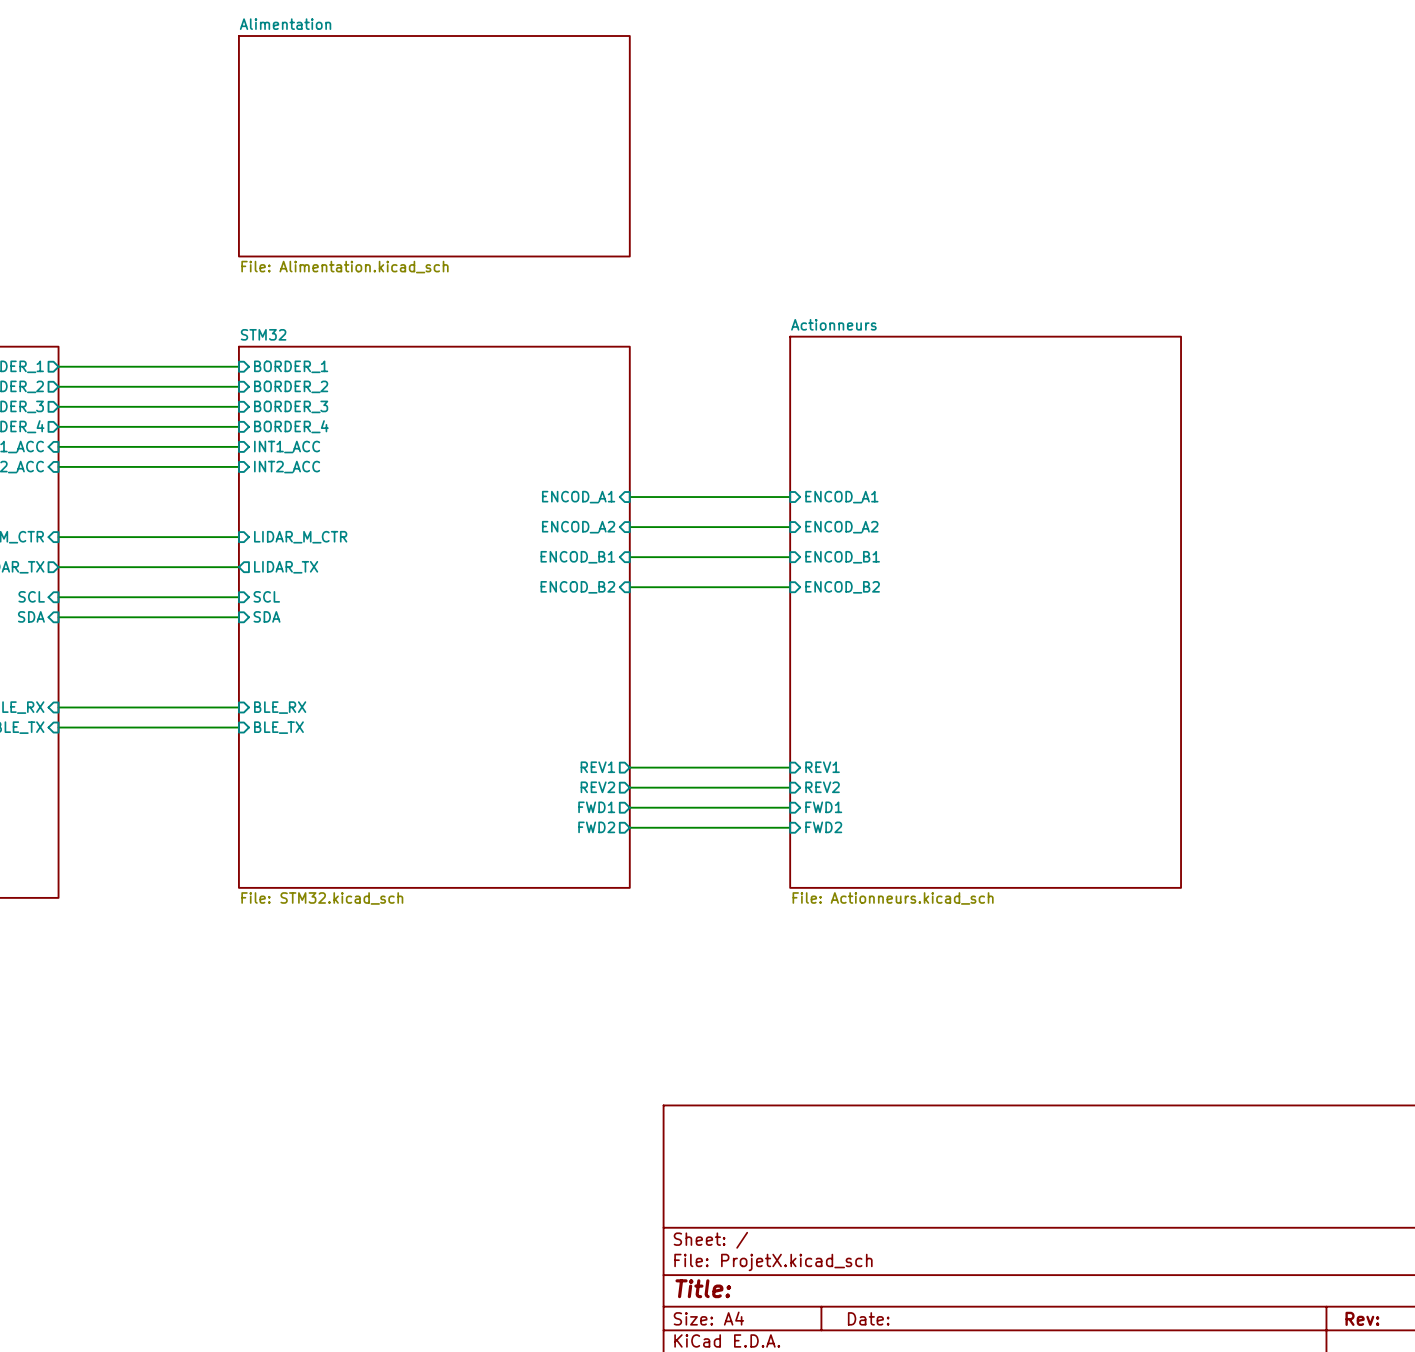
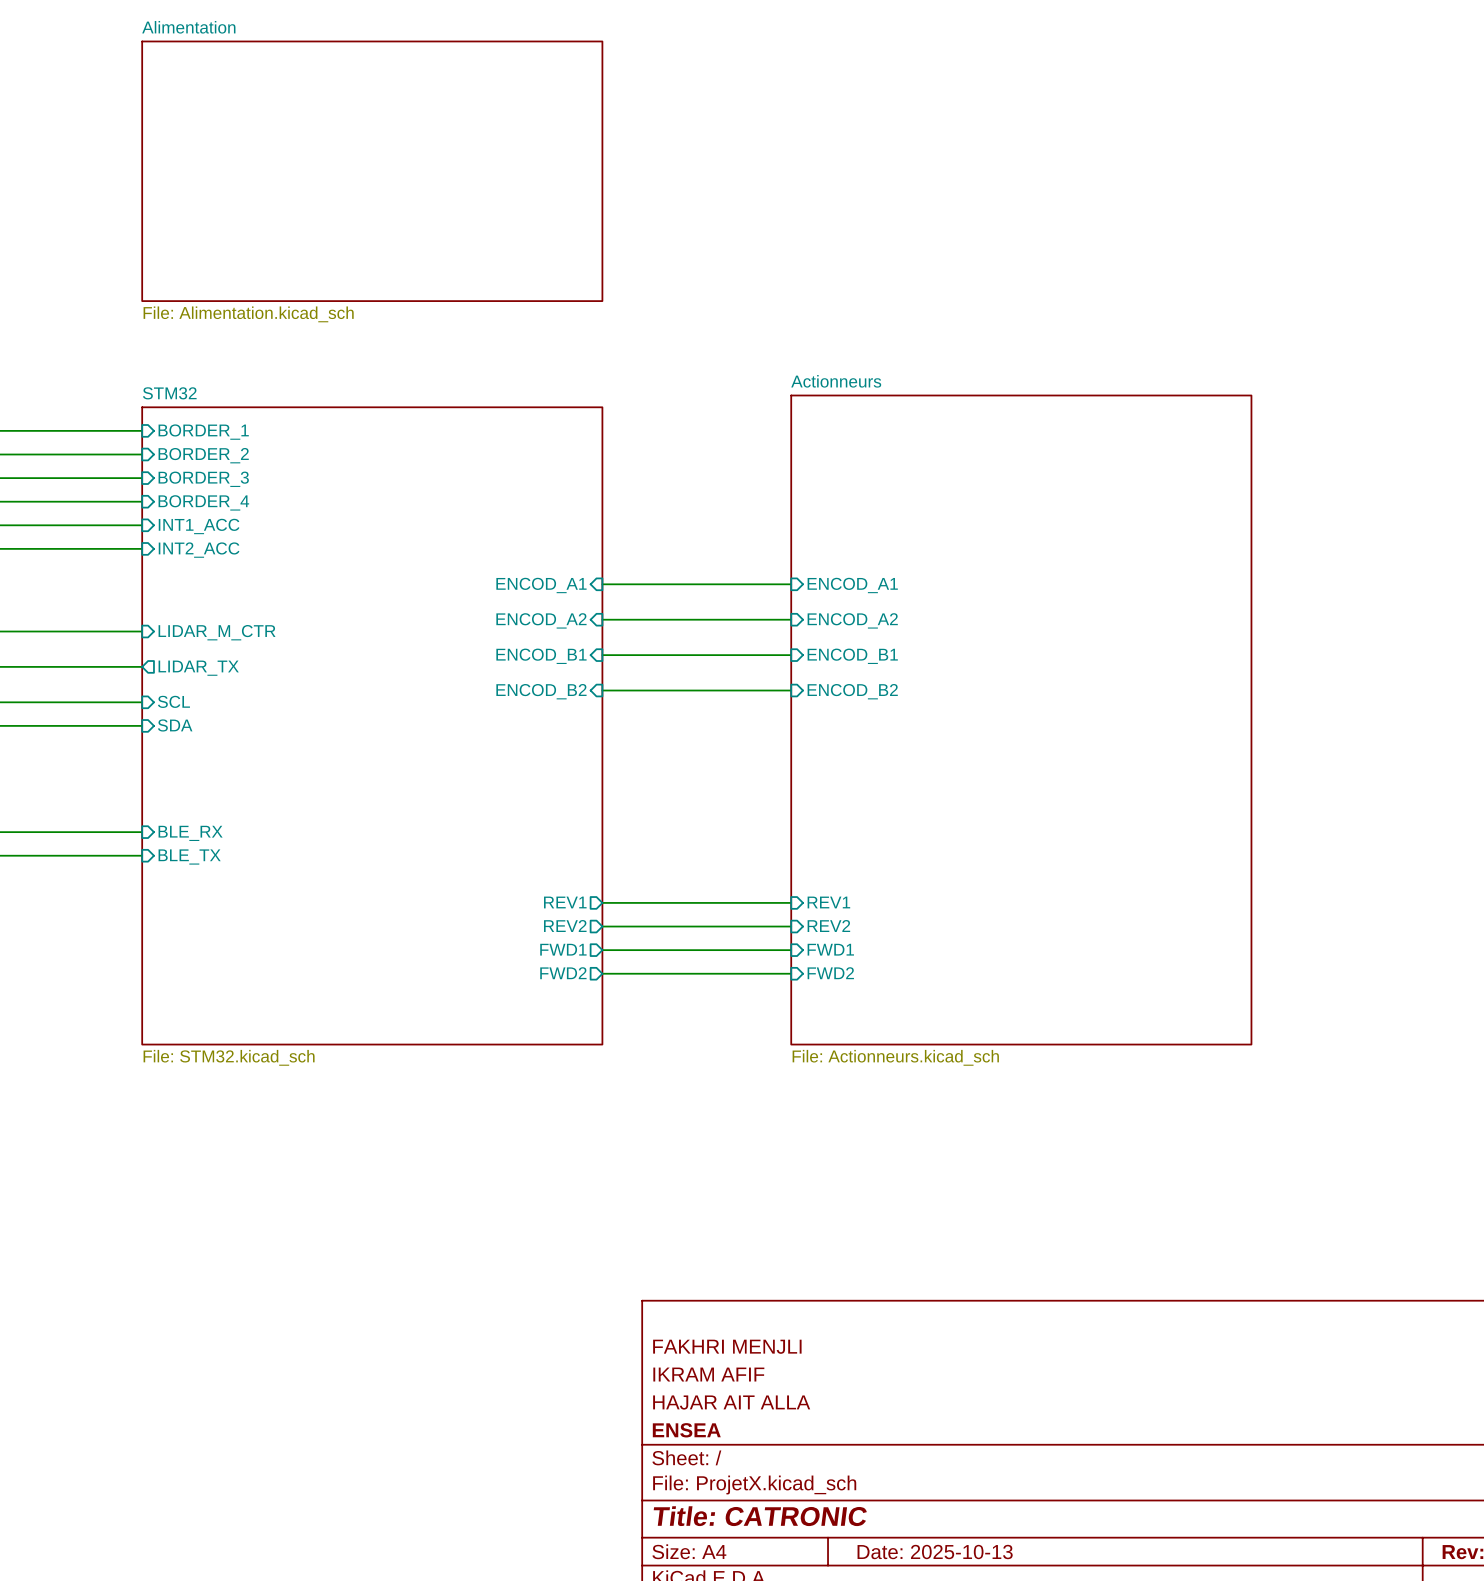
title block: none -> FAKHRI MENJLI (727, 1346)
title block: none -> IKRAM AFIF (708, 1374)
title block: none -> HAJAR AIT ALLA (731, 1402)
title block: none -> ENSEA (686, 1430)
title block: Title: (703, 1288) -> Title: CATRONIC (760, 1516)
title block: Date: (868, 1318) -> Date: 2025-10-13 (935, 1552)

